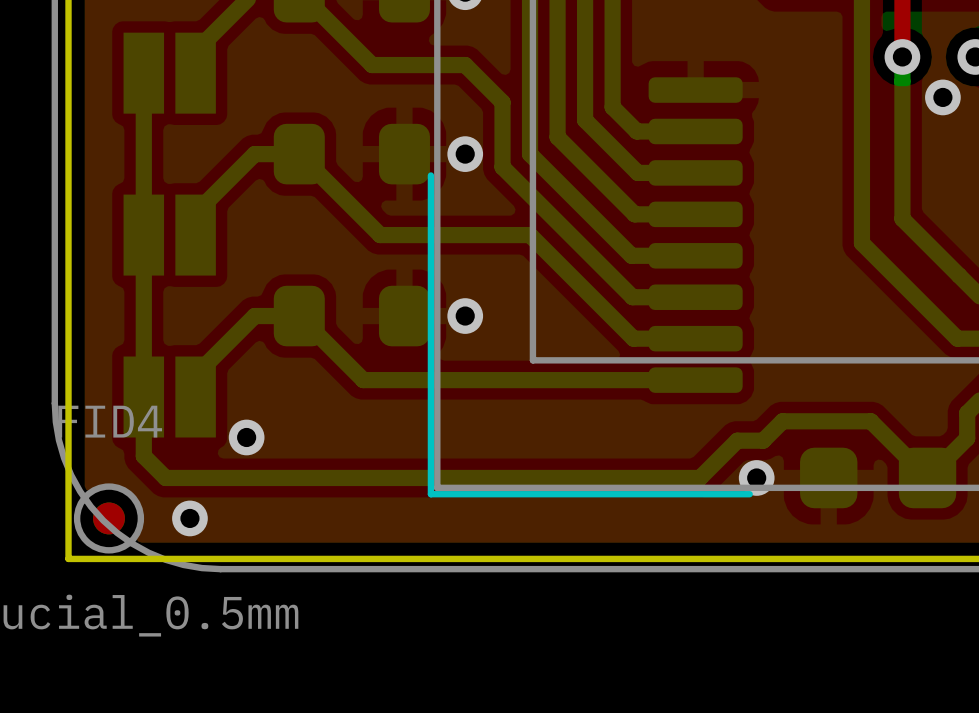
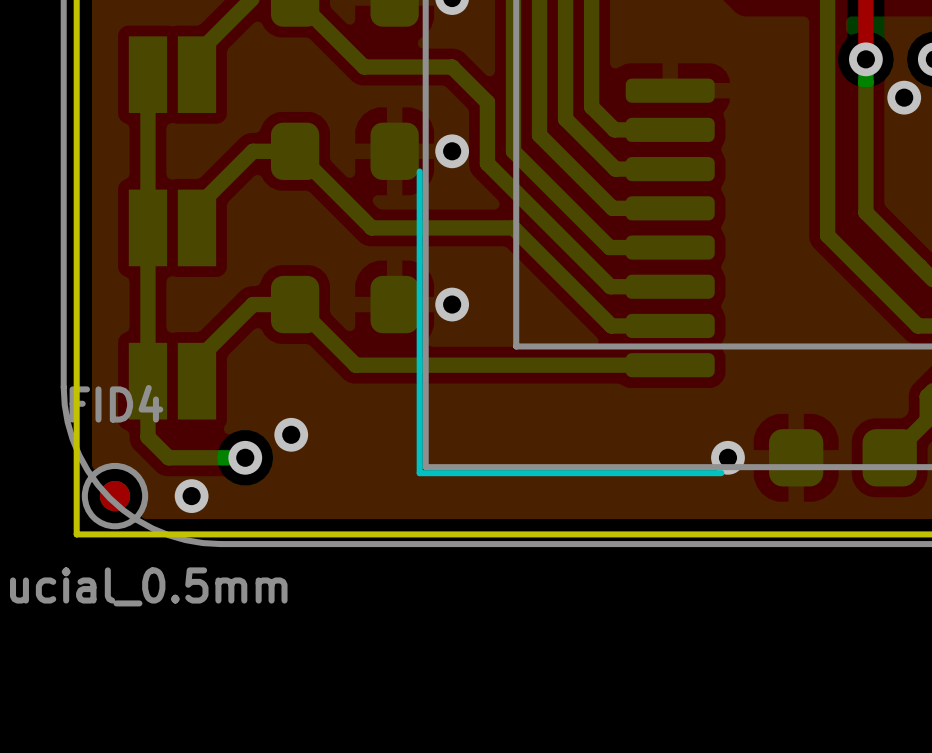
via: (246, 437) -> none
via: none -> (291, 434)
bottom track: (246, 477) (700, 477) (737, 440) (763, 440) (782, 421) (870, 421) (927, 477) -> none
via: none -> (245, 457)

